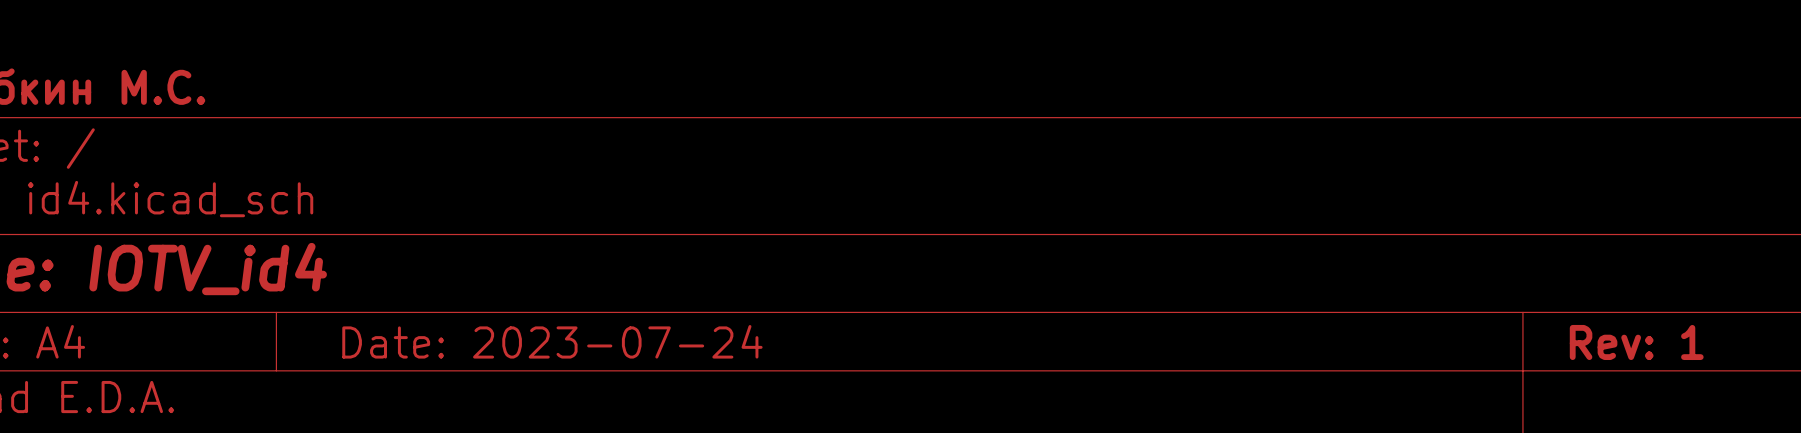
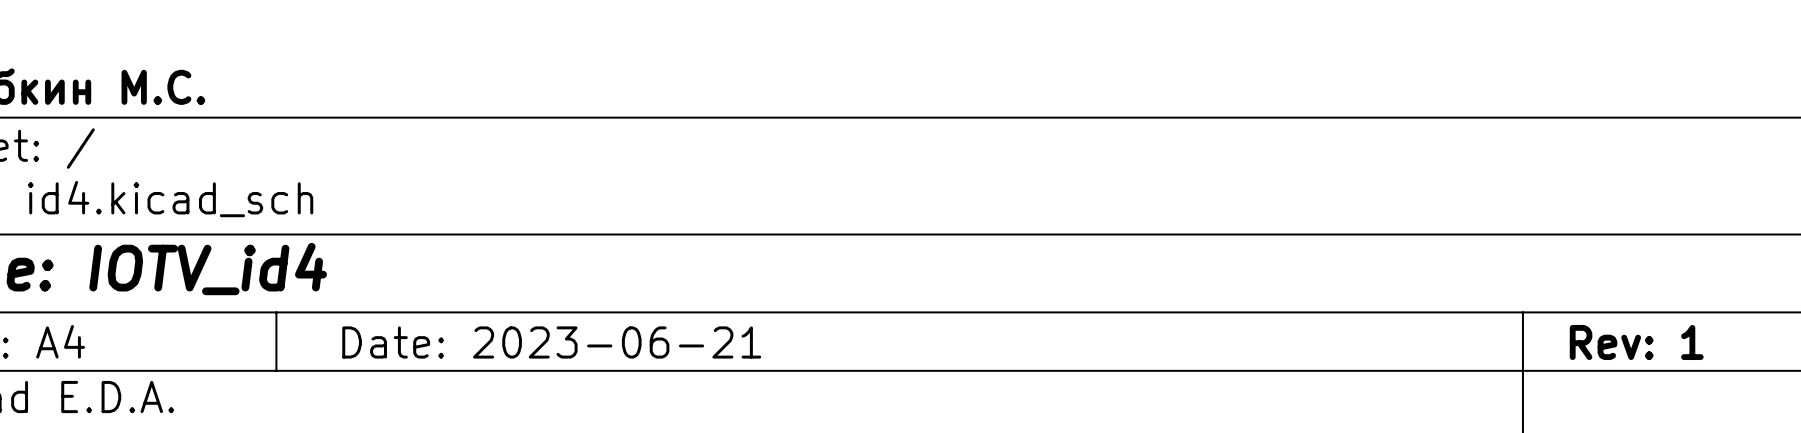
title block: Date: 2023-07-24 (552, 341) -> Date: 2023-06-21 (551, 342)

